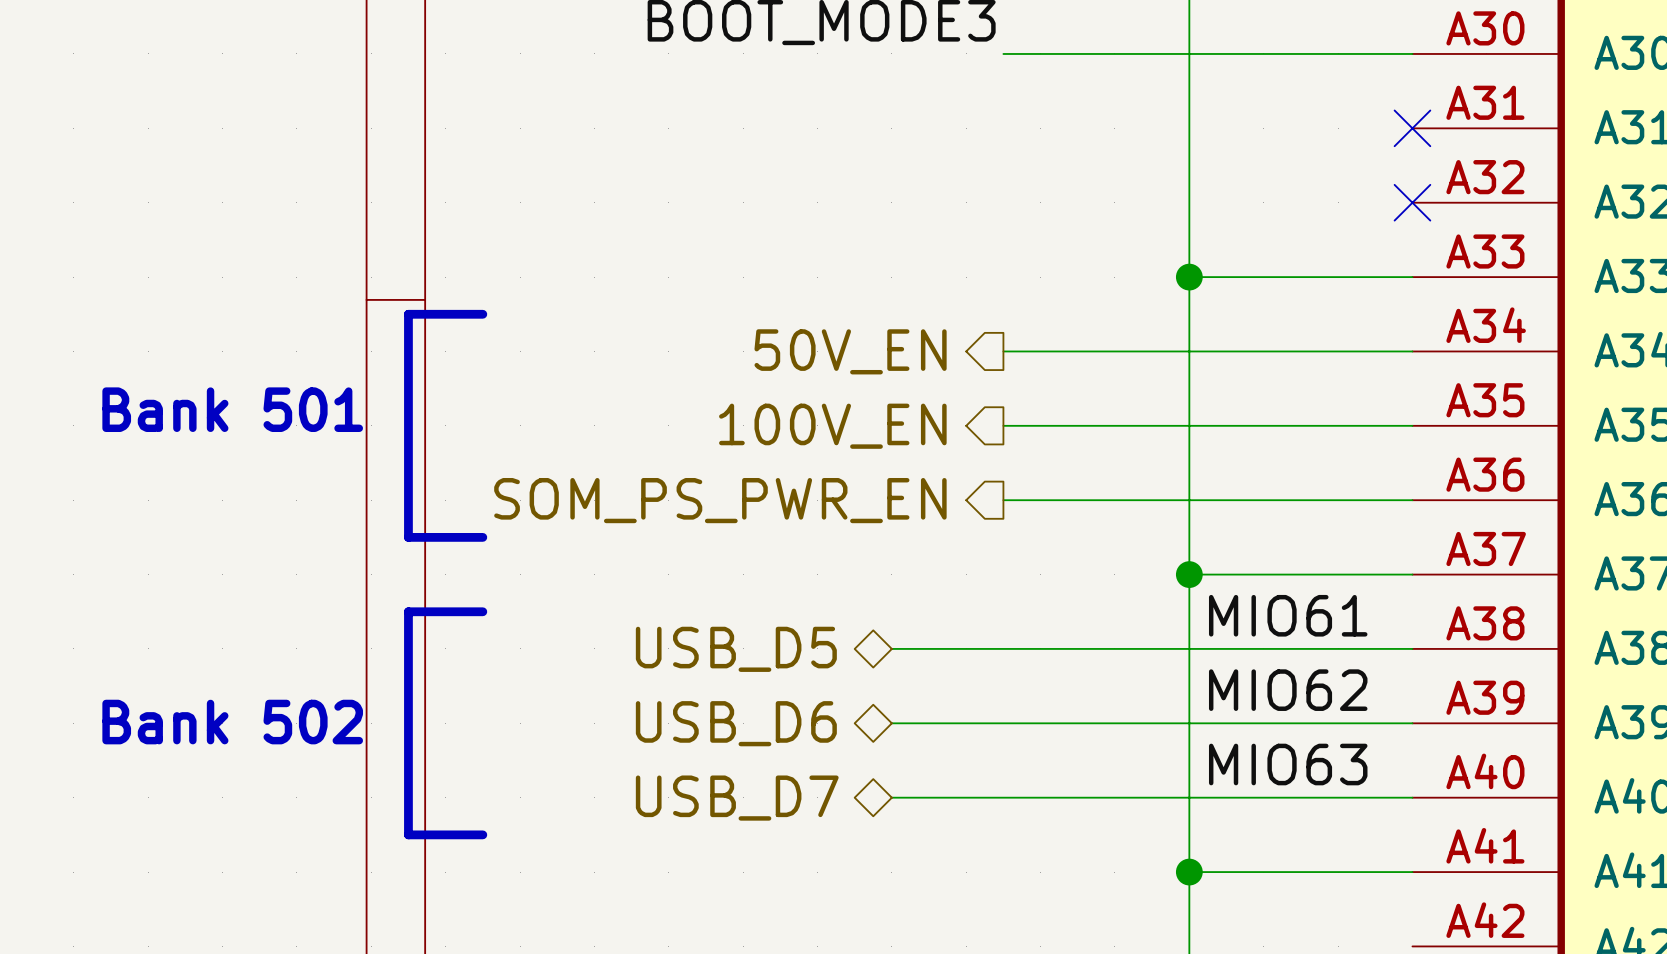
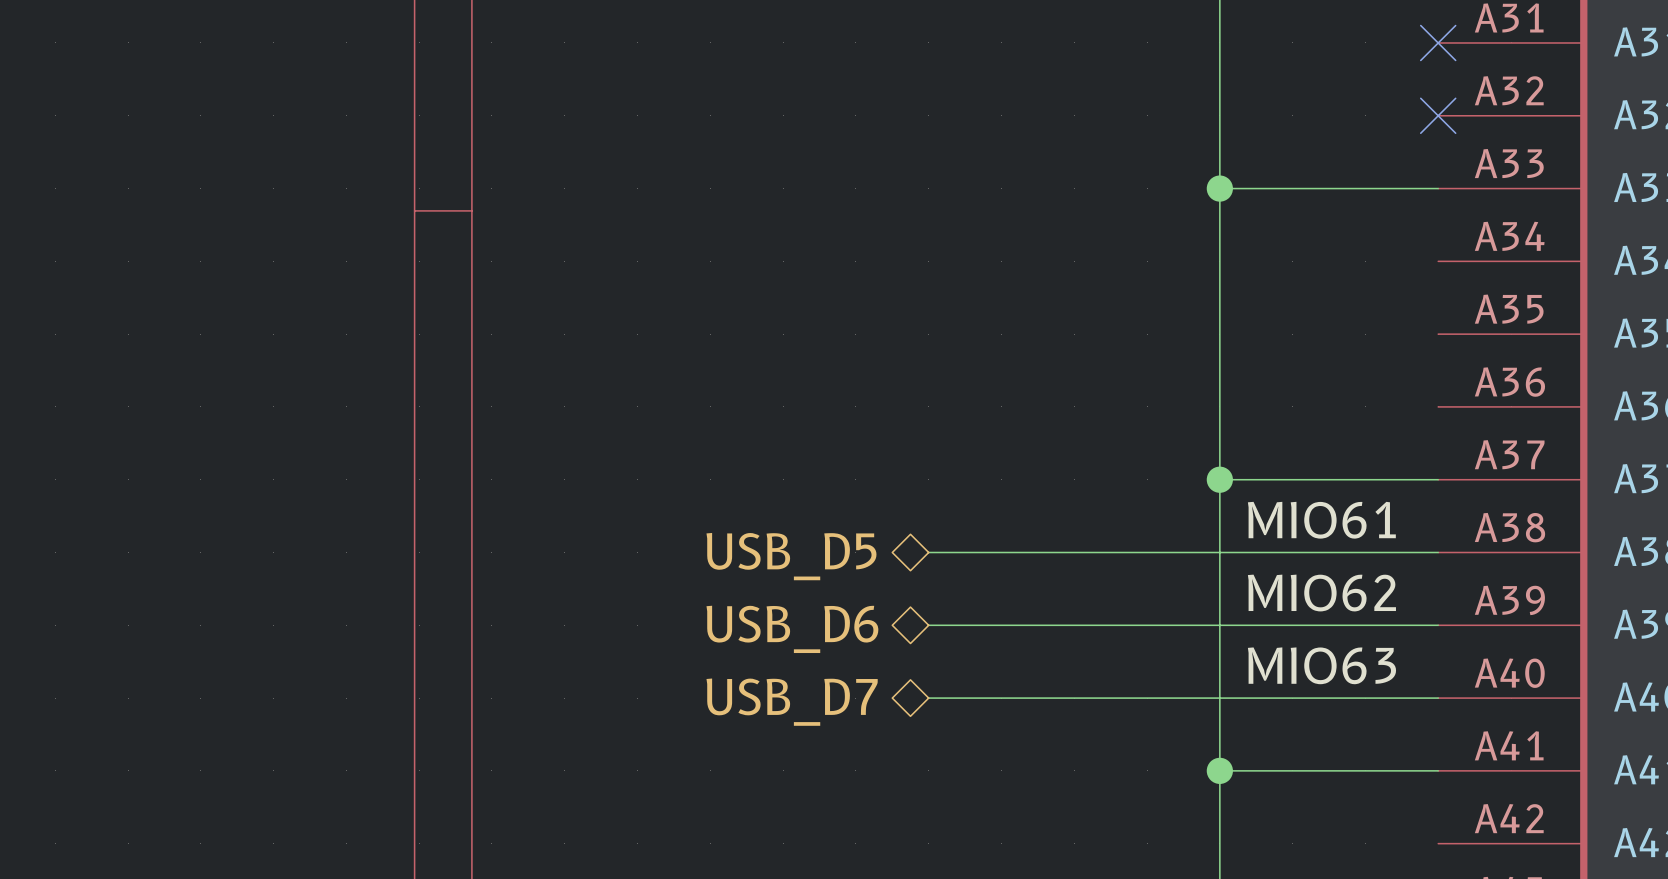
line: (482, 314) (408, 314) (408, 537) (482, 537) -> none
hierarchical label: 50V_EN (850, 351) -> none
wire: (1003, 351) (1412, 351) -> none
text: Bank 501 (232, 409) -> none
wire: (1003, 425) (1412, 425) -> none
hierarchical label: 100V_EN (832, 426) -> none
hierarchical label: SOM_PS_PWR_EN (720, 500) -> none
wire: (1003, 500) (1412, 500) -> none
line: (482, 611) (408, 611) (408, 834) (482, 834) -> none
text: Bank 502 (232, 722) -> none

